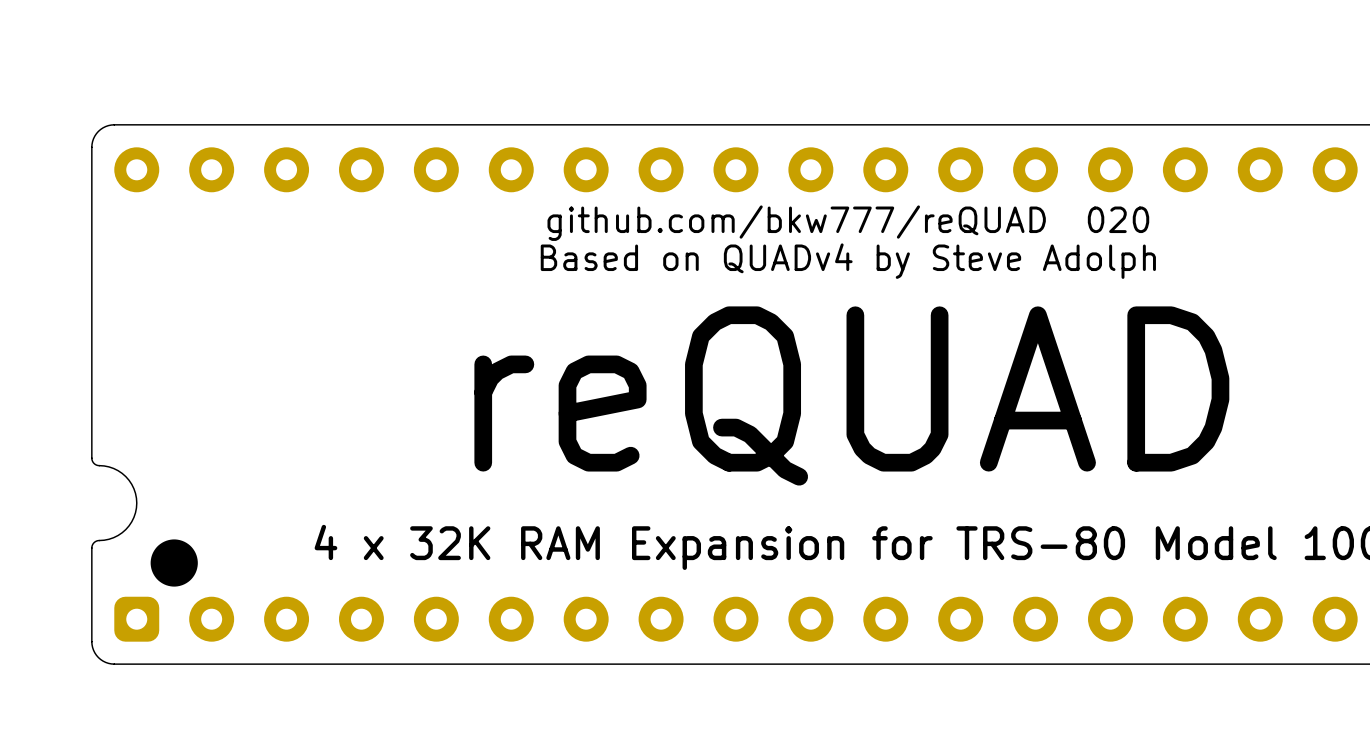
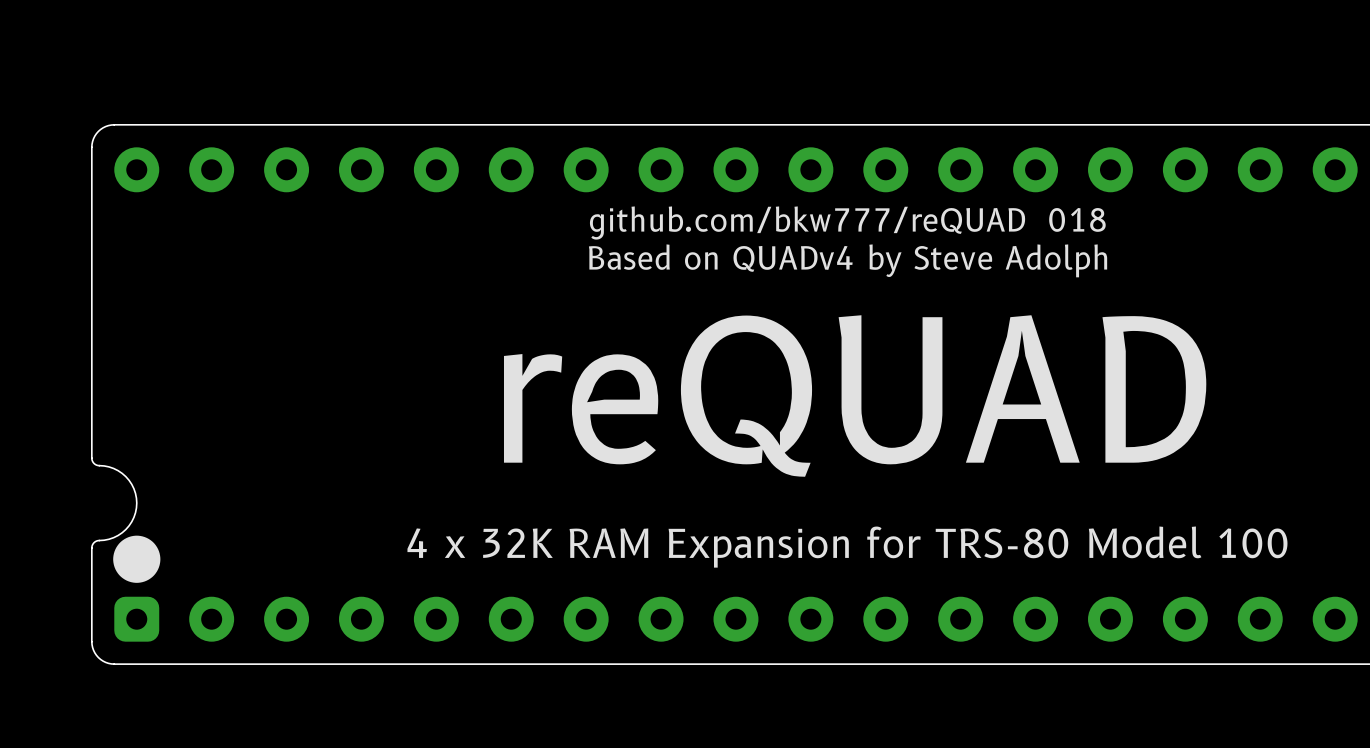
text: github.com/bkw777/reQUAD 020 (848, 223) -> github.com/bkw777/reQUAD 018 (847, 223)
drawing position: (174, 563) -> (136, 559)

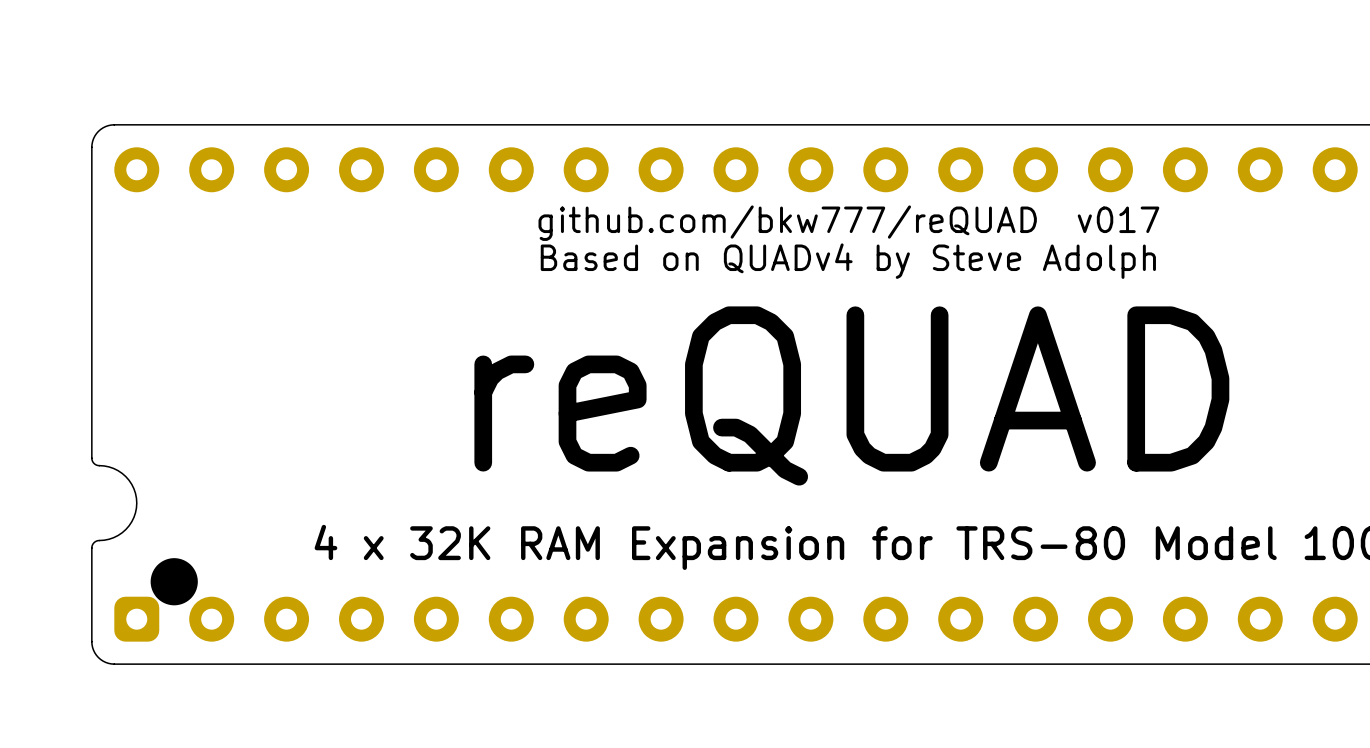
text: github.com/bkw777/reQUAD 018 (847, 223) -> github.com/bkw777/reQUAD v017 (848, 223)
drawing position: (136, 559) -> (174, 581)

